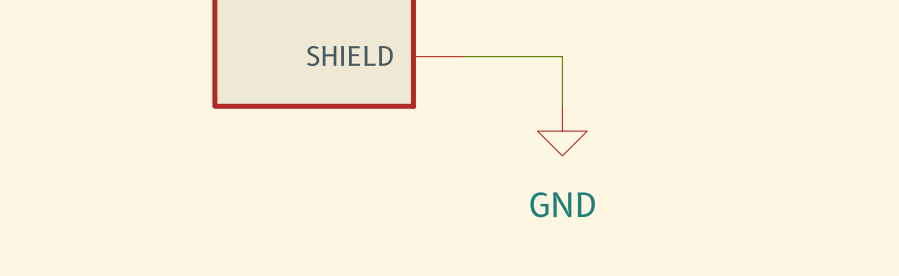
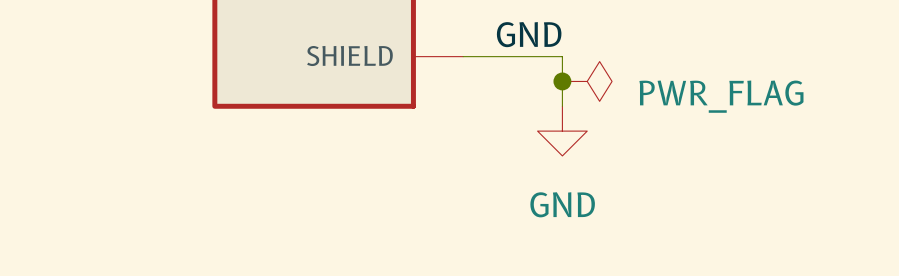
label: none -> GND (529, 34)
junction: none -> (562, 81)
power symbol: none -> PWR_FLAG (587, 81)

